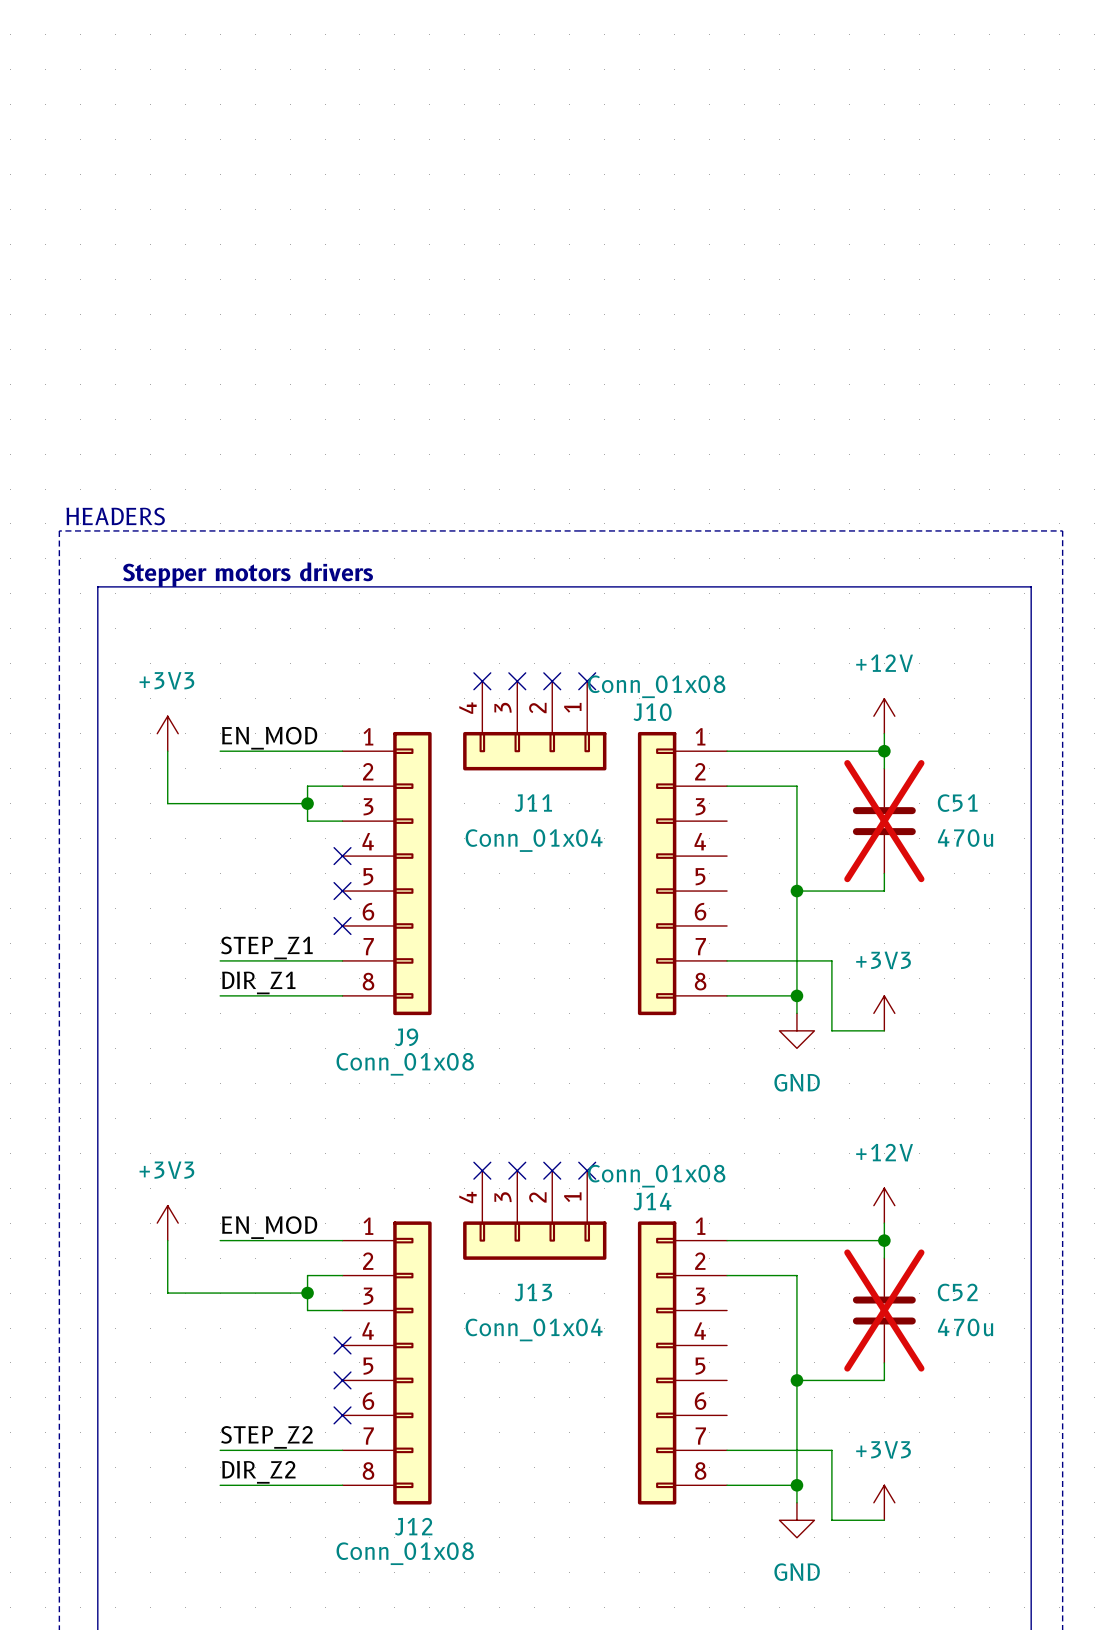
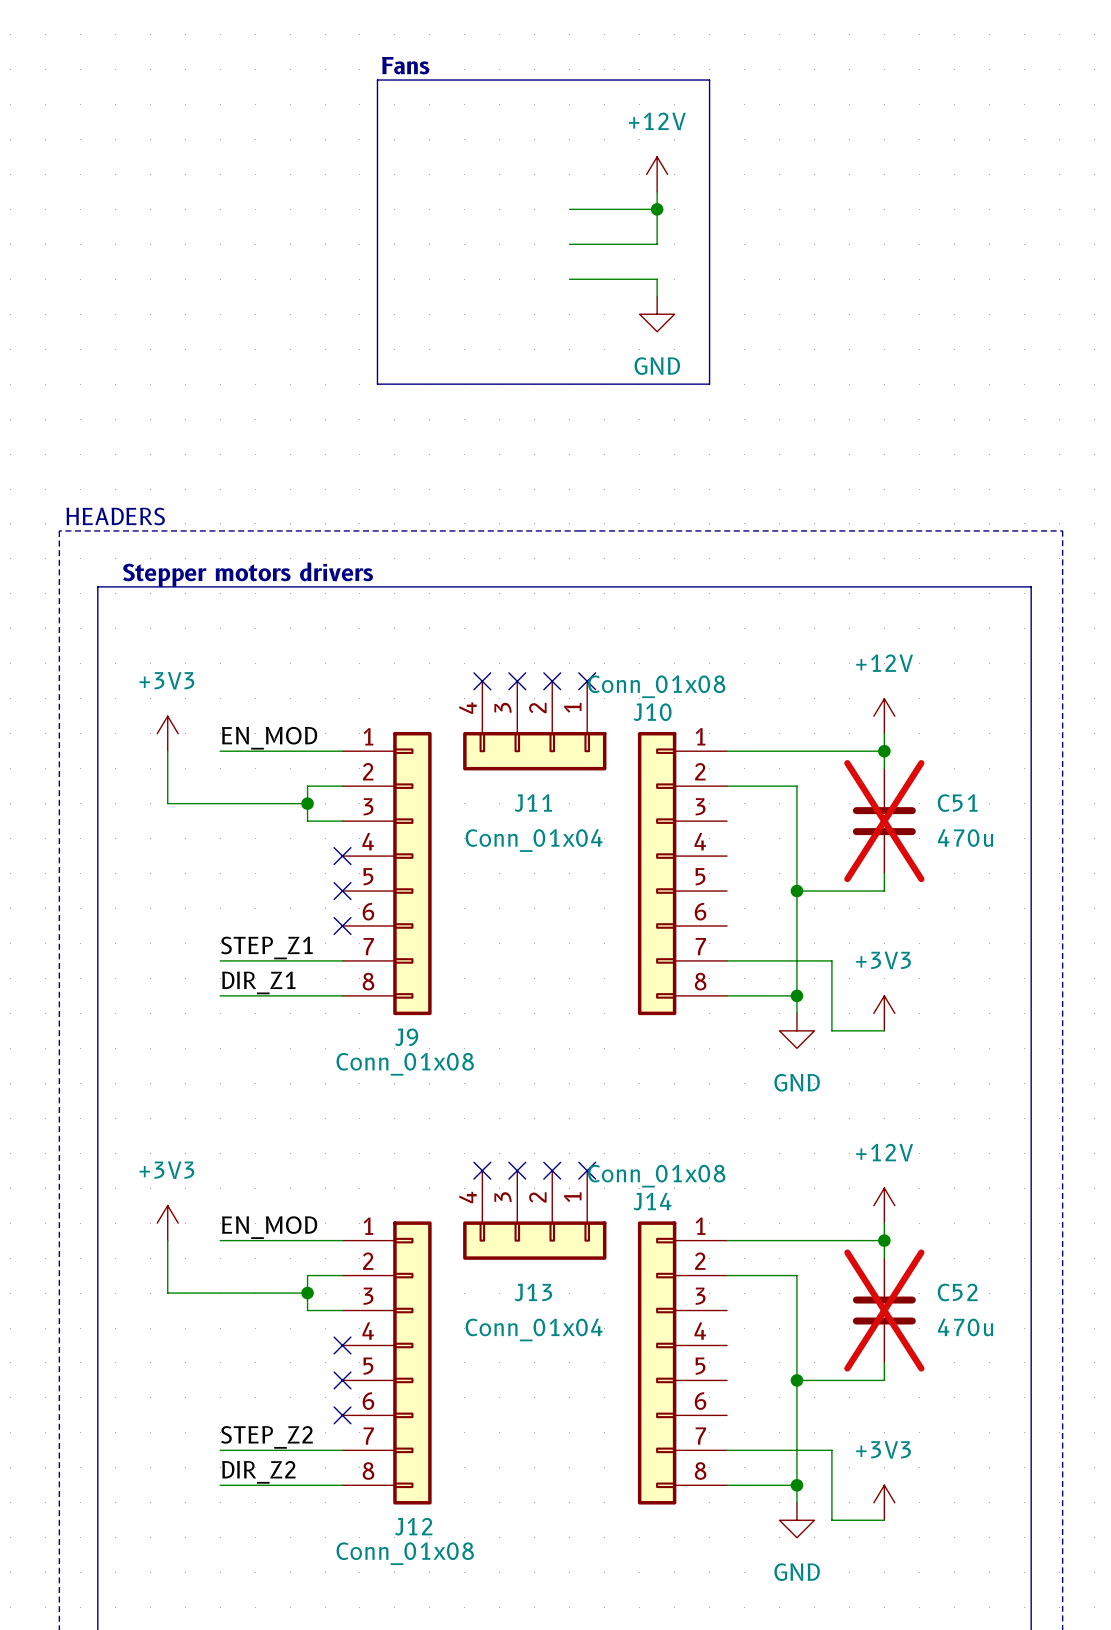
text: none -> Fans (405, 65)
line: none -> (377, 80) (377, 384) (709, 384) (709, 80) (377, 80)
power symbol: none -> +12V (657, 174)
wire: none -> (657, 191) (657, 244) (569, 244)
wire: none -> (569, 209) (657, 209)
junction: none -> (657, 209)
wire: none -> (569, 279) (657, 279) (657, 296)
power symbol: none -> GND (657, 314)

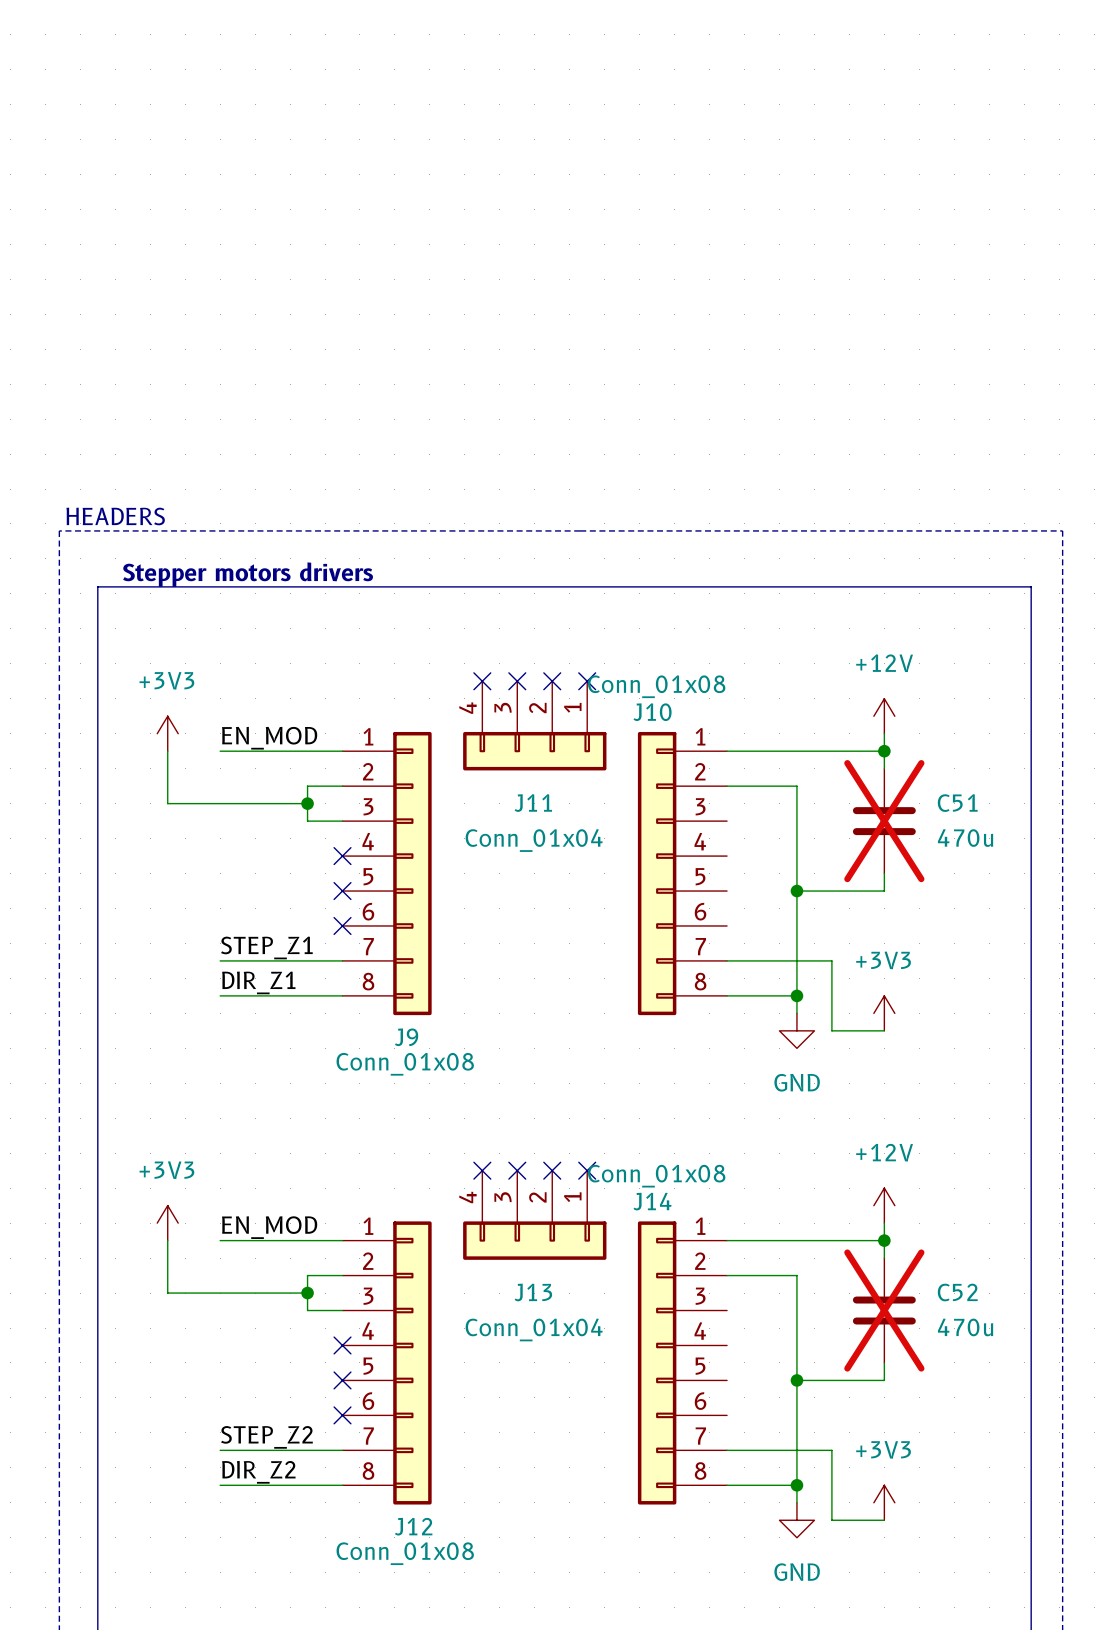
text: Fans (405, 65) -> none
line: (377, 80) (377, 384) (709, 384) (709, 80) (377, 80) -> none
power symbol: +12V (657, 174) -> none
wire: (657, 191) (657, 244) (569, 244) -> none
wire: (569, 209) (657, 209) -> none
junction: (657, 209) -> none
wire: (569, 279) (657, 279) (657, 296) -> none
power symbol: GND (657, 314) -> none

